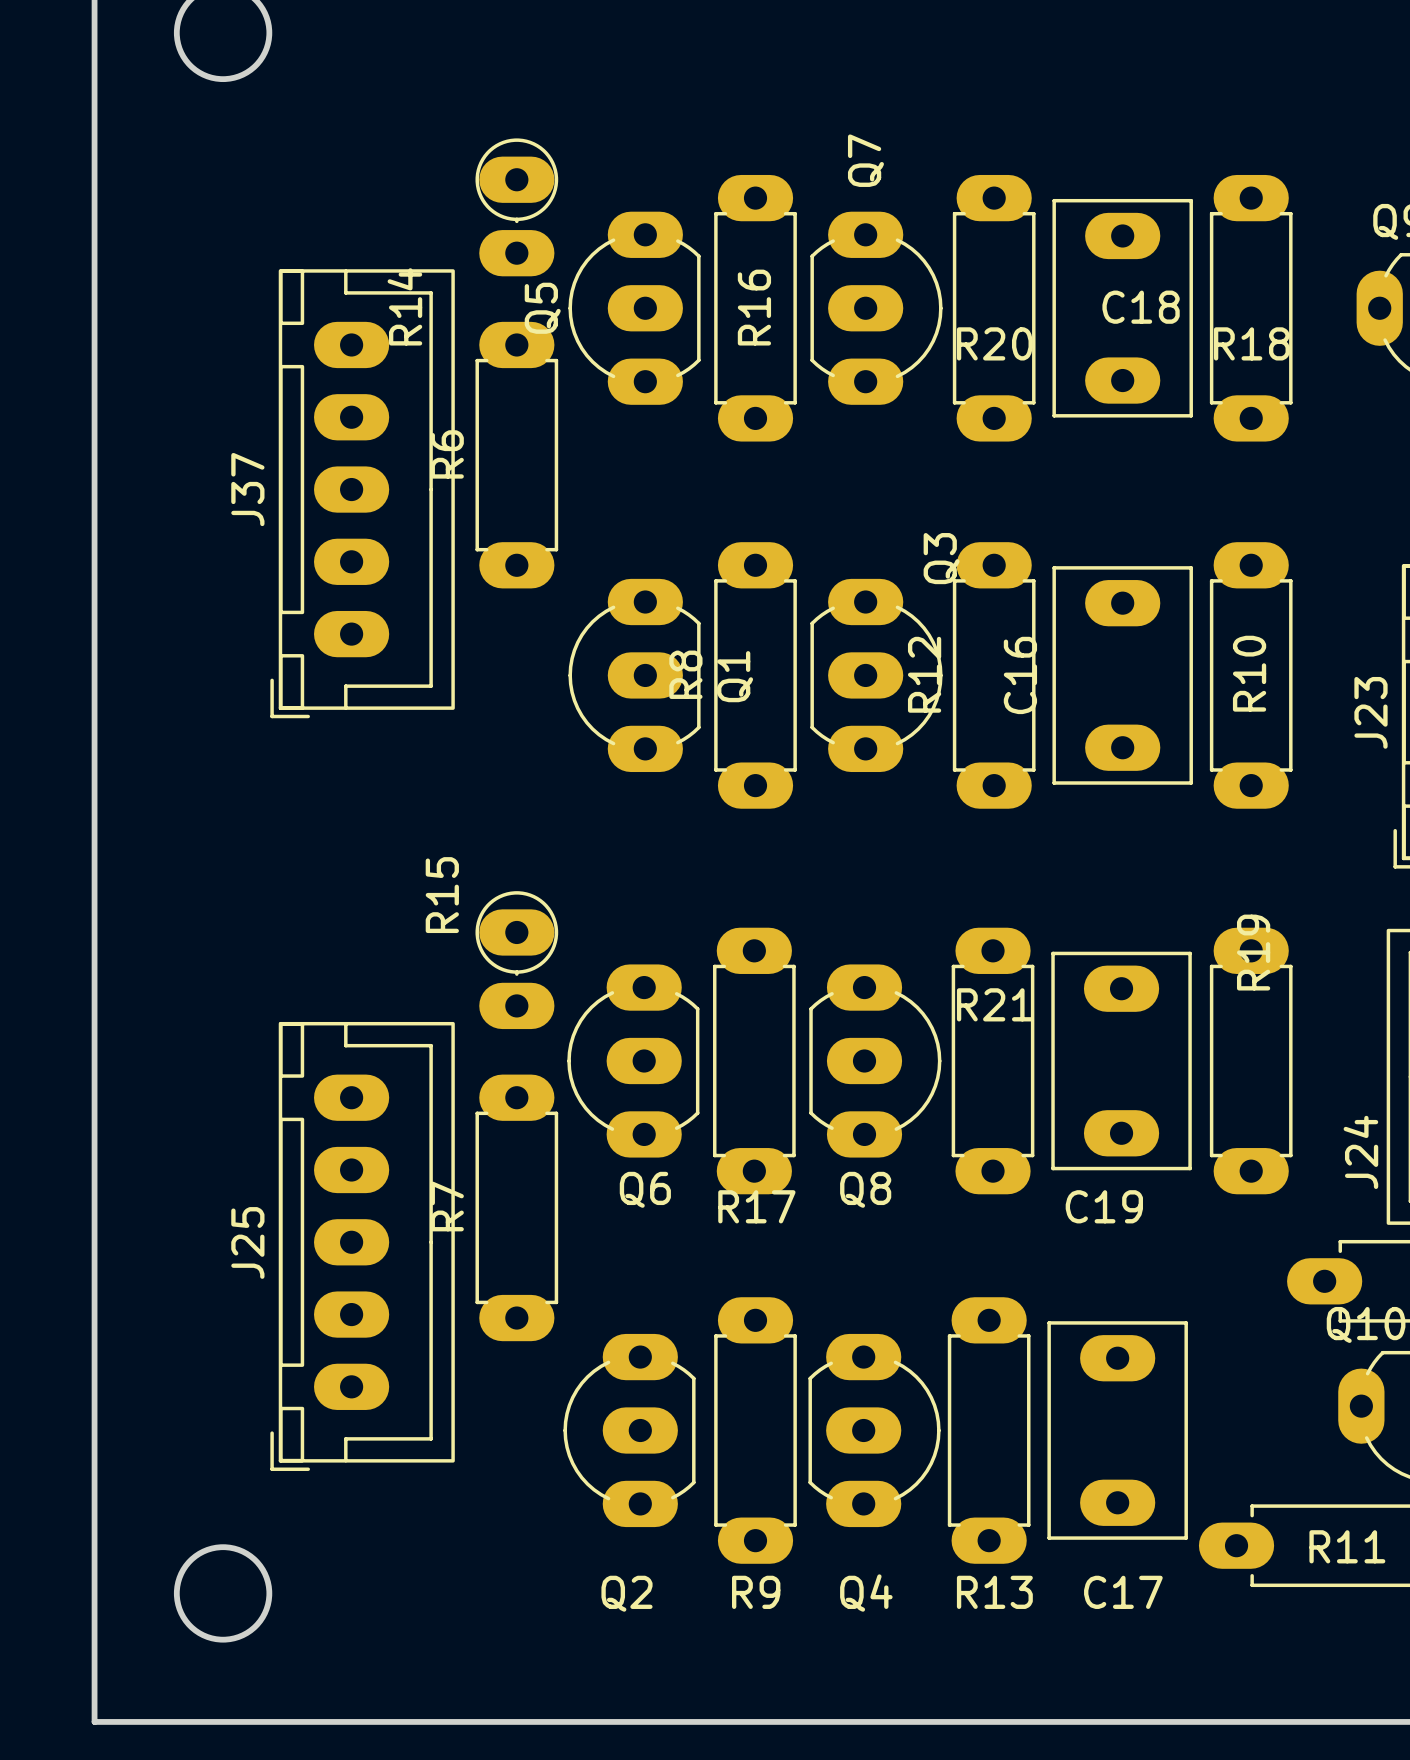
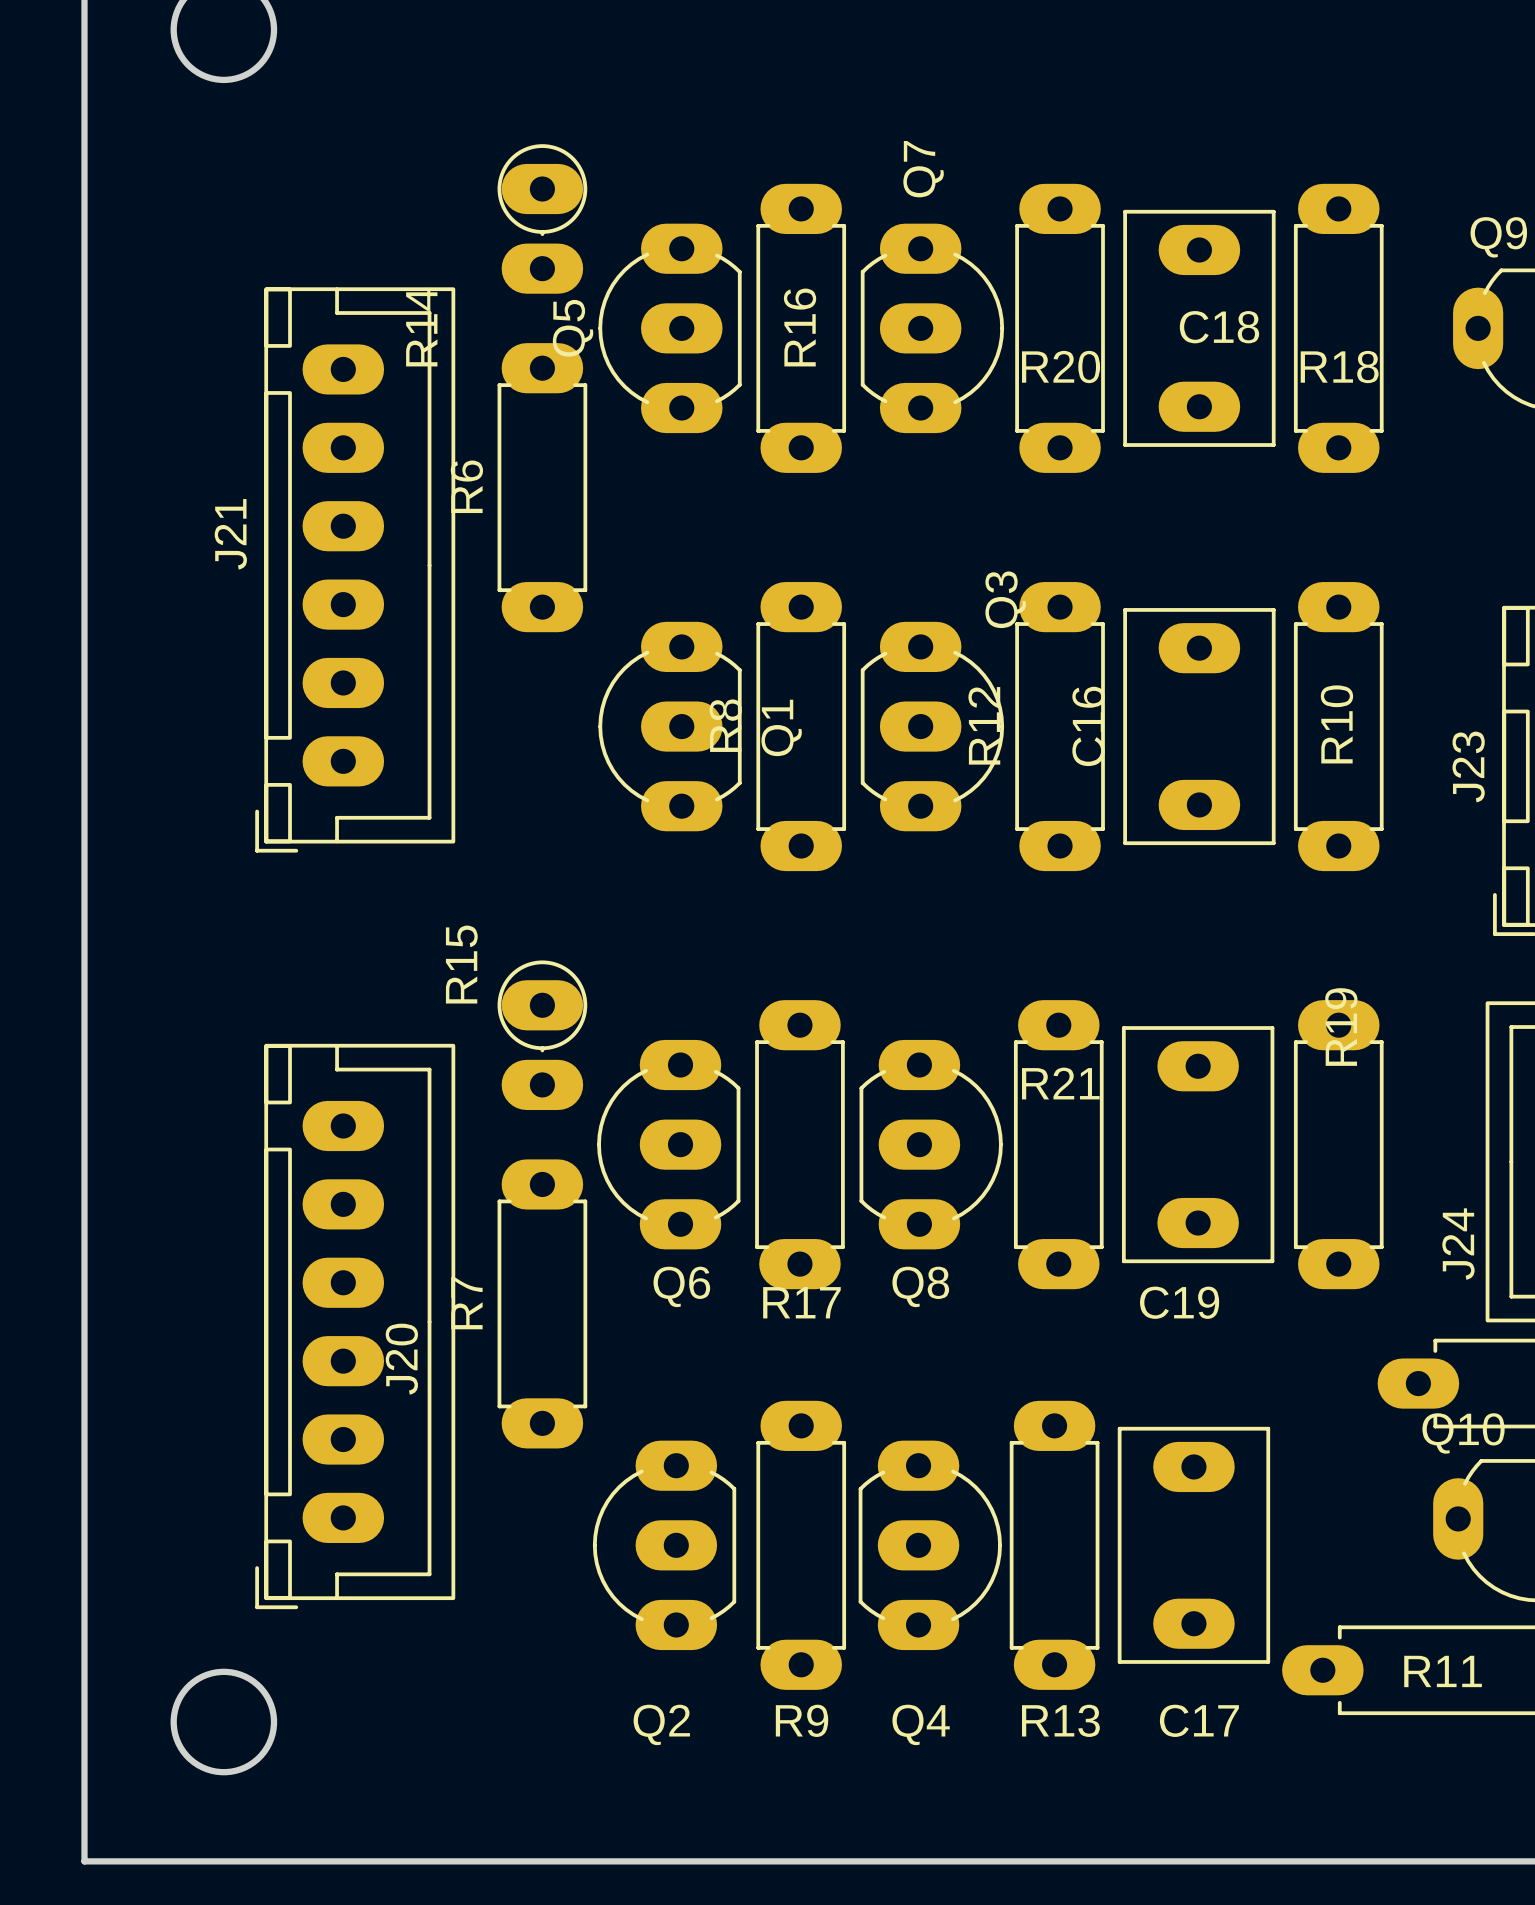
J37: (362, 493) -> none
J21: none -> (355, 569)
J20: none -> (355, 1326)
J25: (362, 1246) -> none

